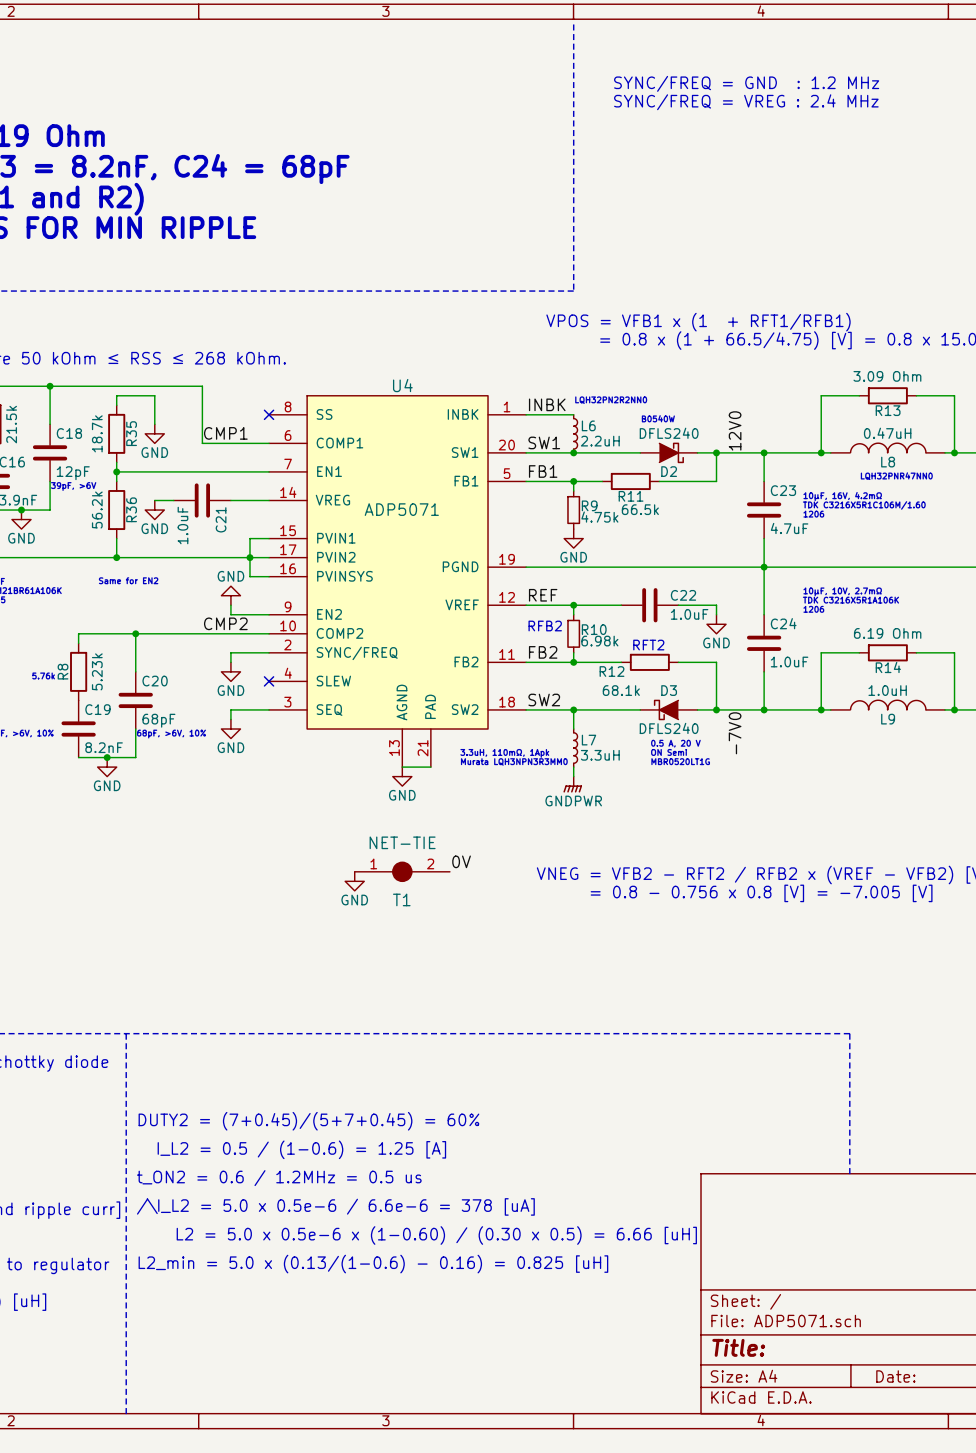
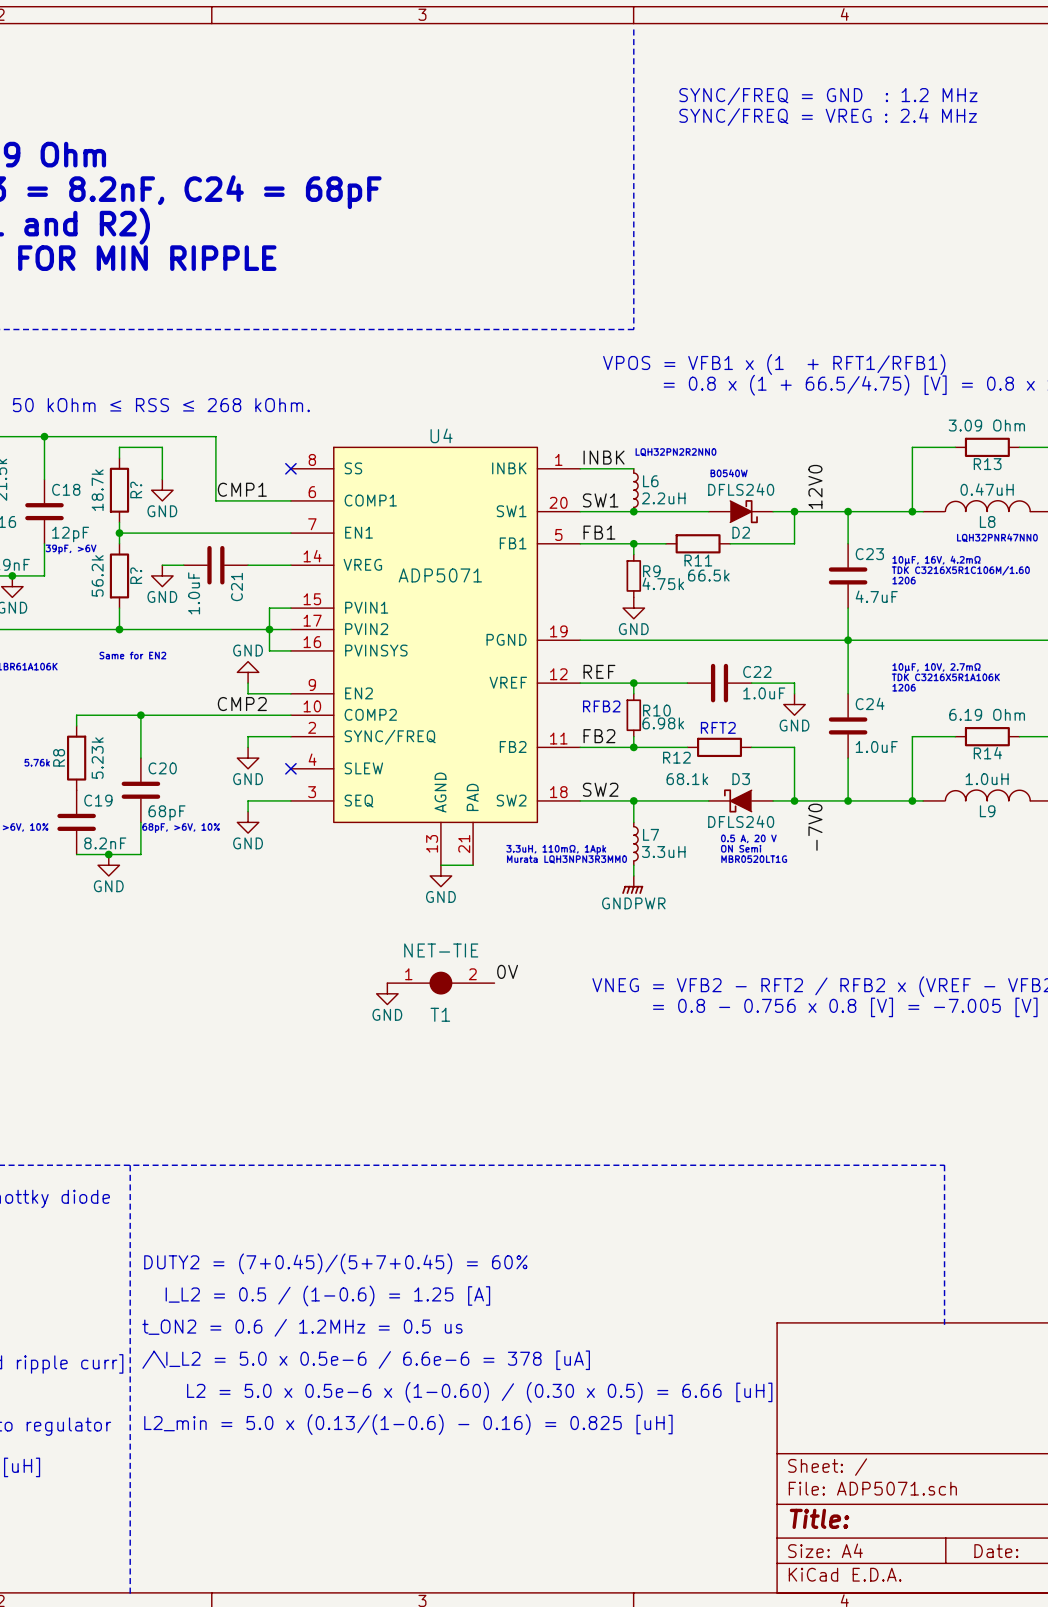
R35 name: R35 (131, 433) -> R? (136, 489)
R36 name: R36 (131, 509) -> R? (136, 575)

